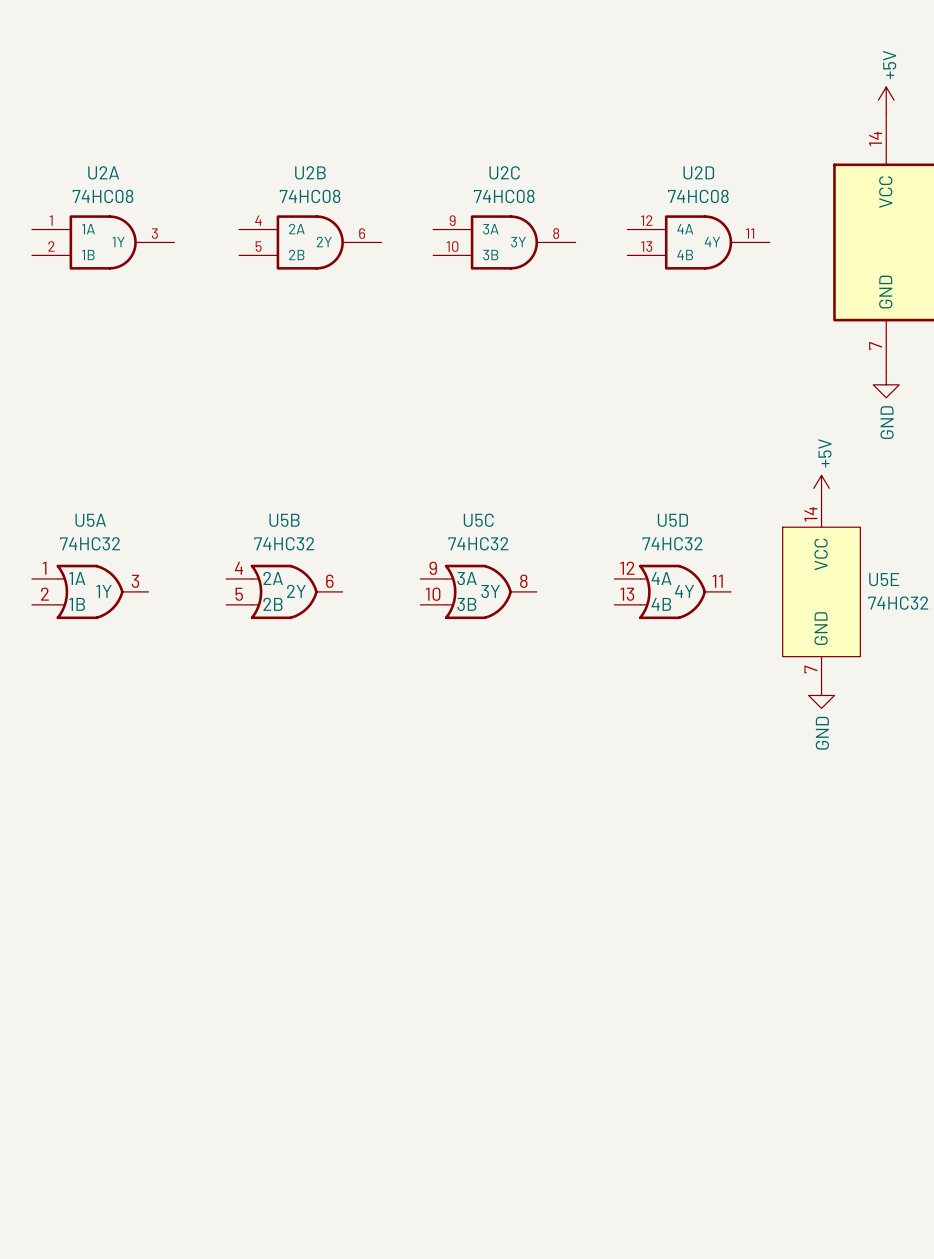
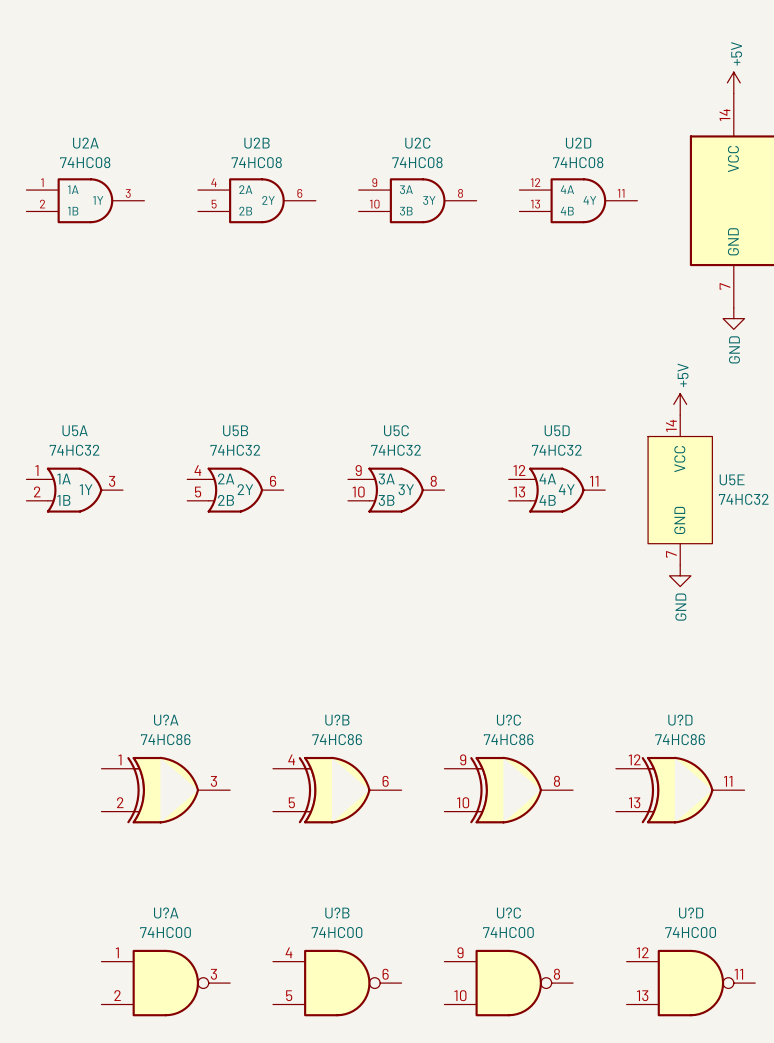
U?A: none -> 74HC86 (165, 790)
U?B: none -> 74HC86 (337, 790)
U?C: none -> 74HC86 (508, 790)
U?D: none -> 74HC86 (680, 790)
U?A: none -> 74HC00 (165, 983)
U?B: none -> 74HC00 (337, 983)
U?C: none -> 74HC00 (508, 983)
U?D: none -> 74HC00 (690, 983)

